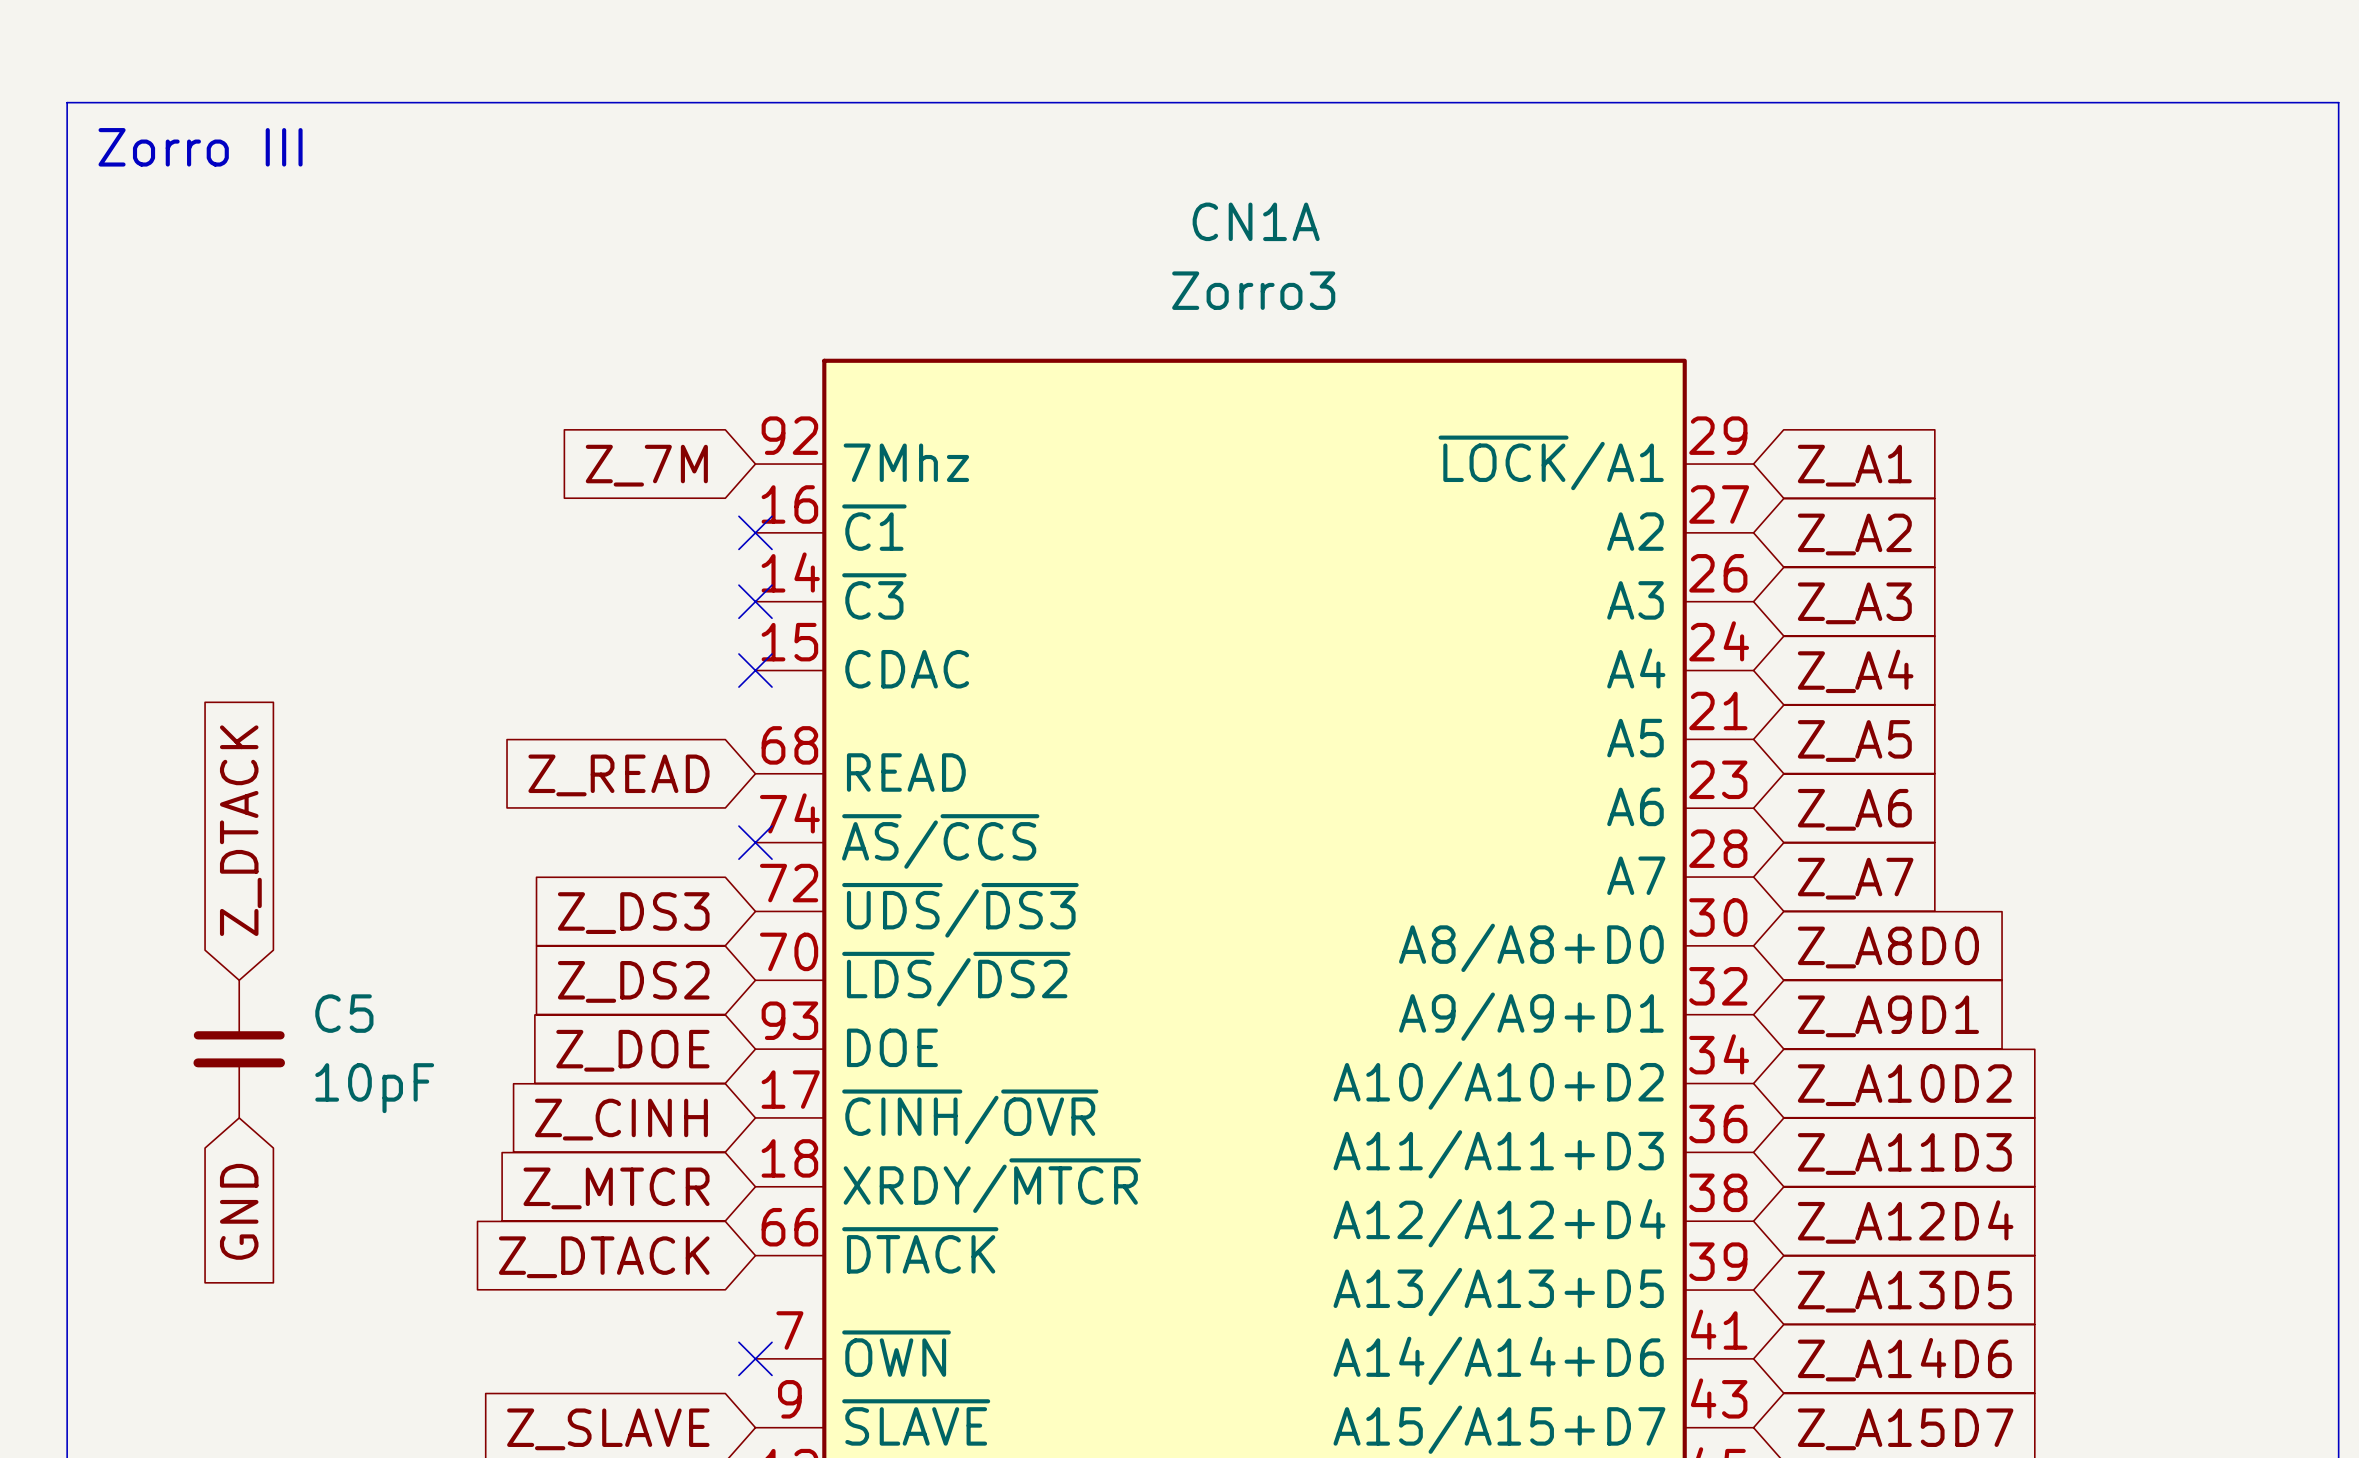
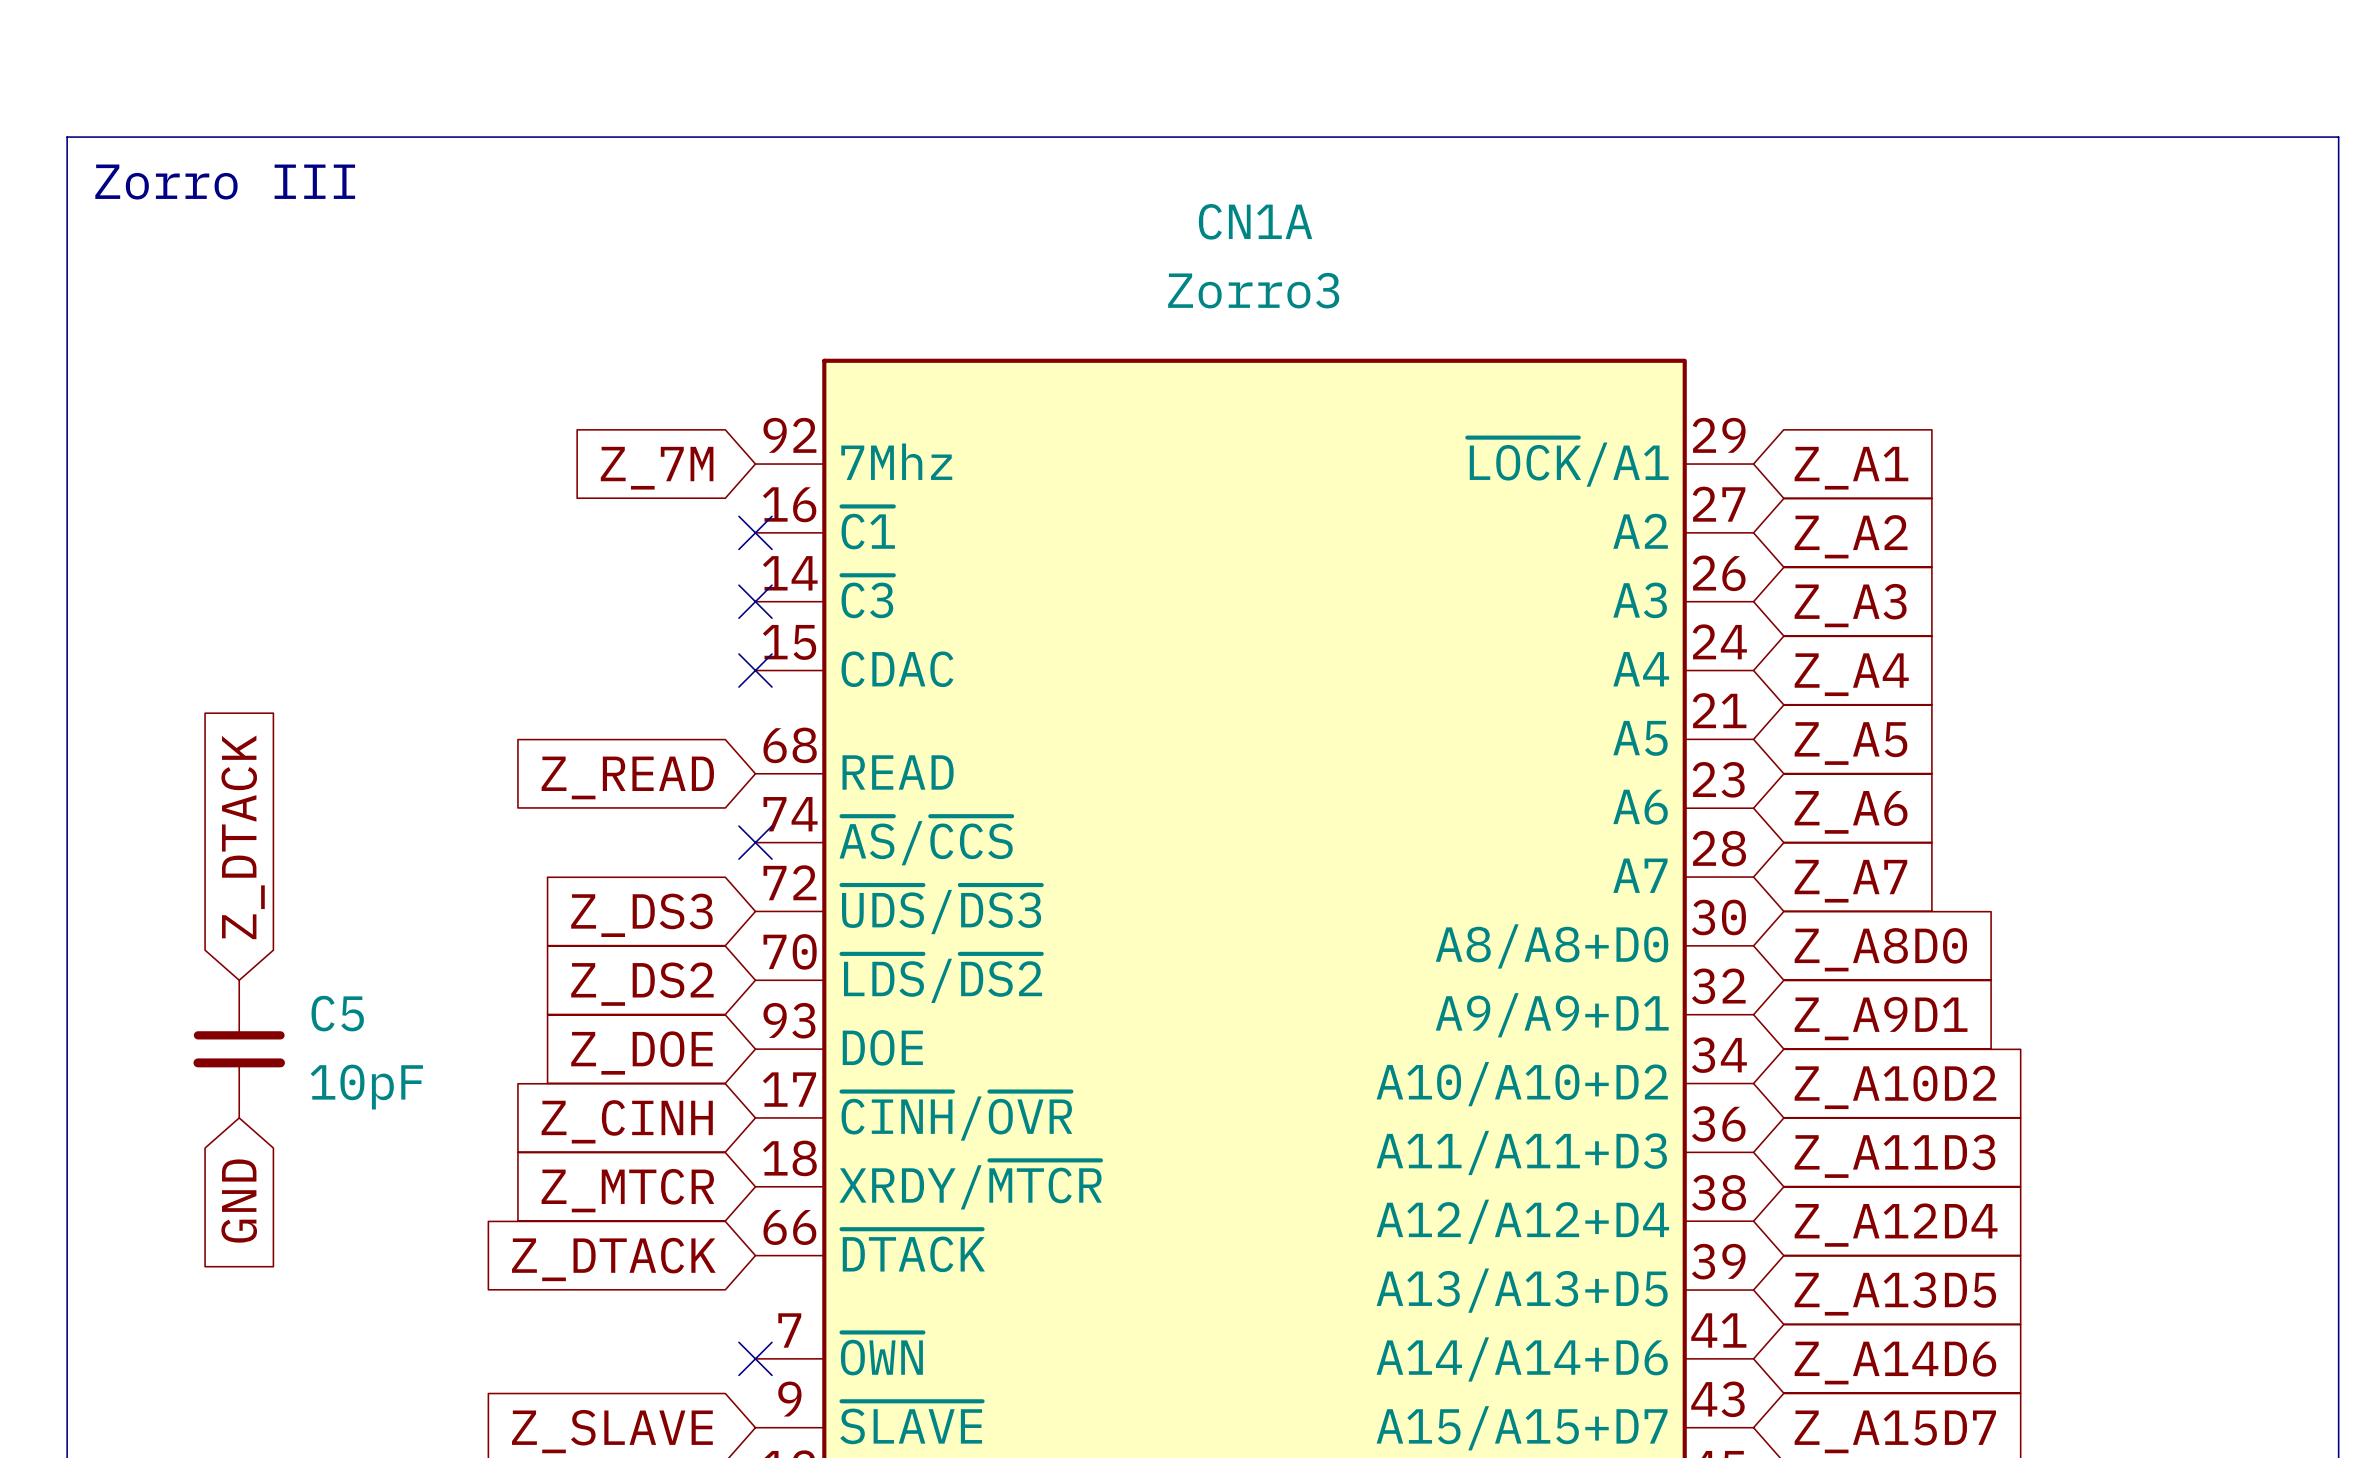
line: (67, 137) (67, 102) (2338, 102) (2338, 137) -> (67, 137) (2338, 137)
text position: Zorro III (200, 147) -> Zorro III (225, 182)

